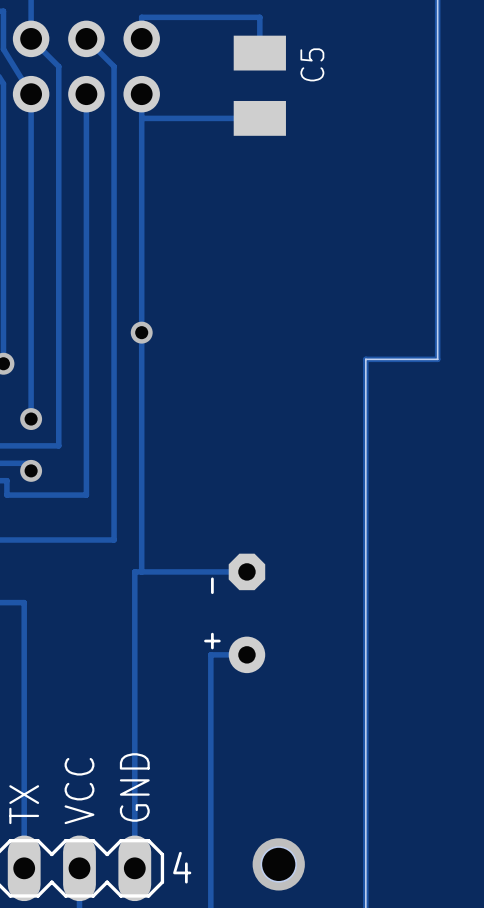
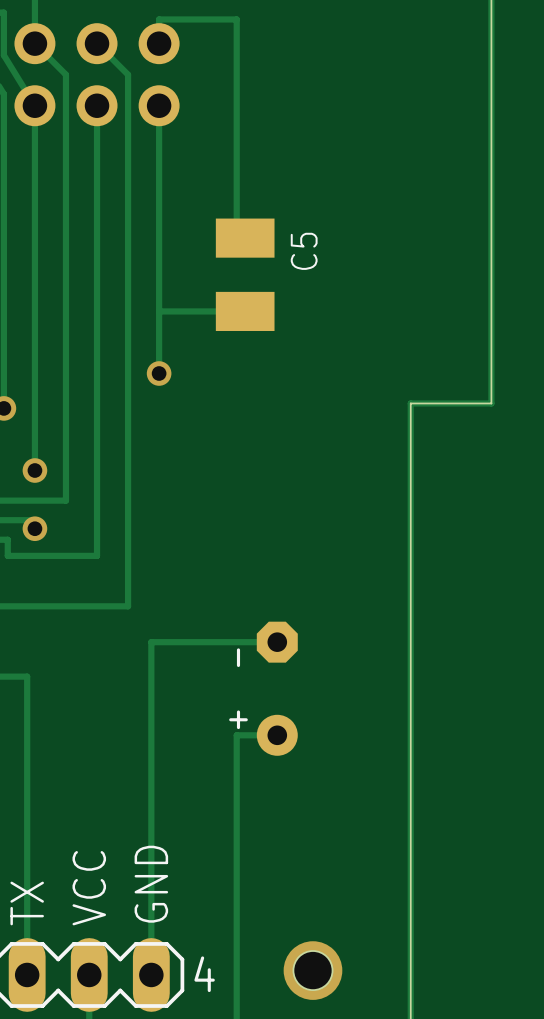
track: (210, 17) (259, 17) (259, 53) -> (236, 19) (236, 238) (245, 238)
C5 position: (259, 85) -> (245, 274)
track: (141, 118) (259, 118) -> none
track: none -> (159, 311) (245, 311)
track: (141, 332) (141, 571) -> none

